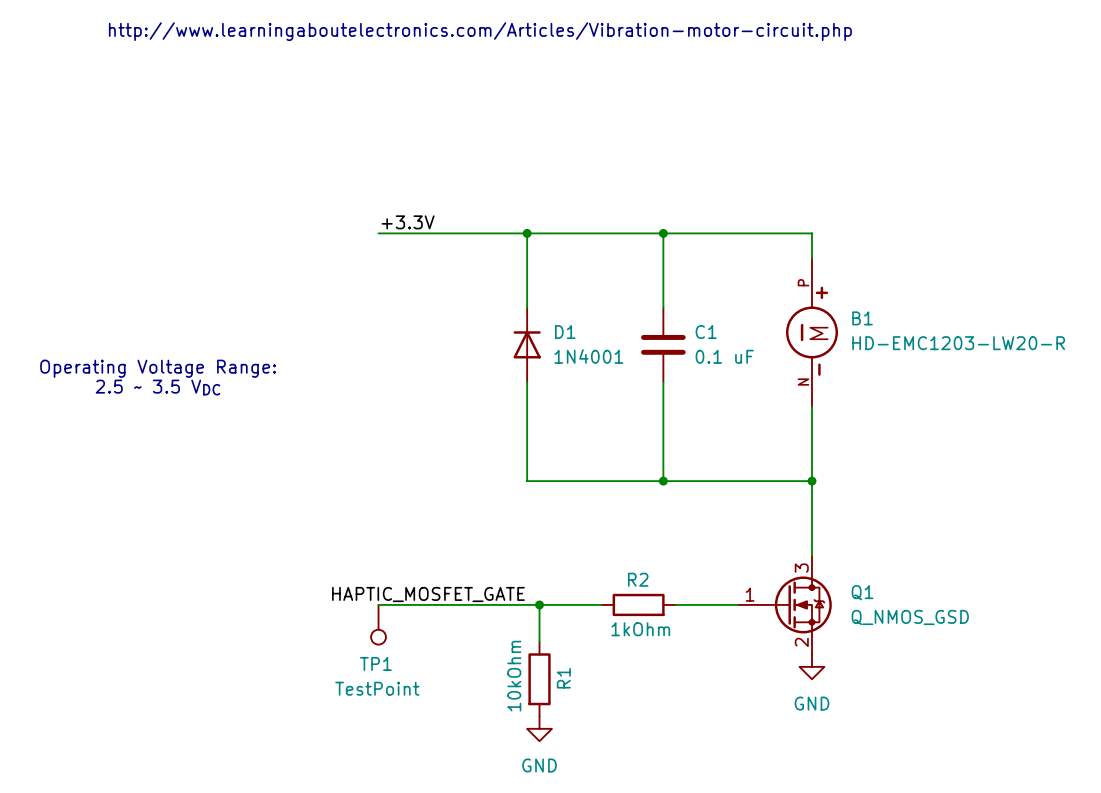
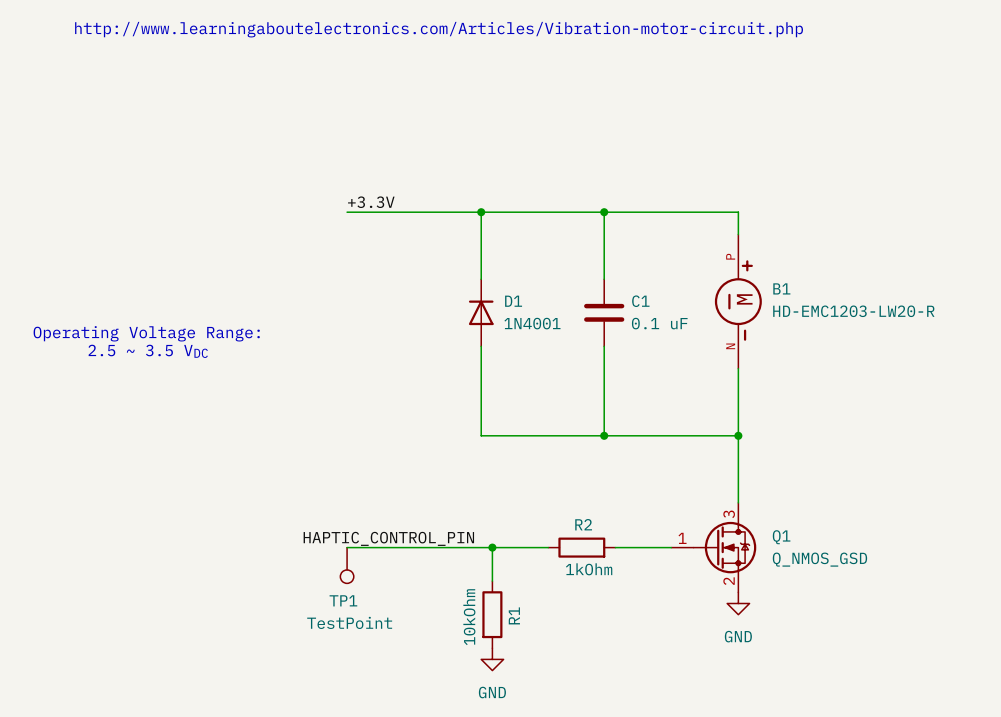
label: HAPTIC_MOSFET_GATE (428, 594) -> HAPTIC_CONTROL_PIN (388, 538)

